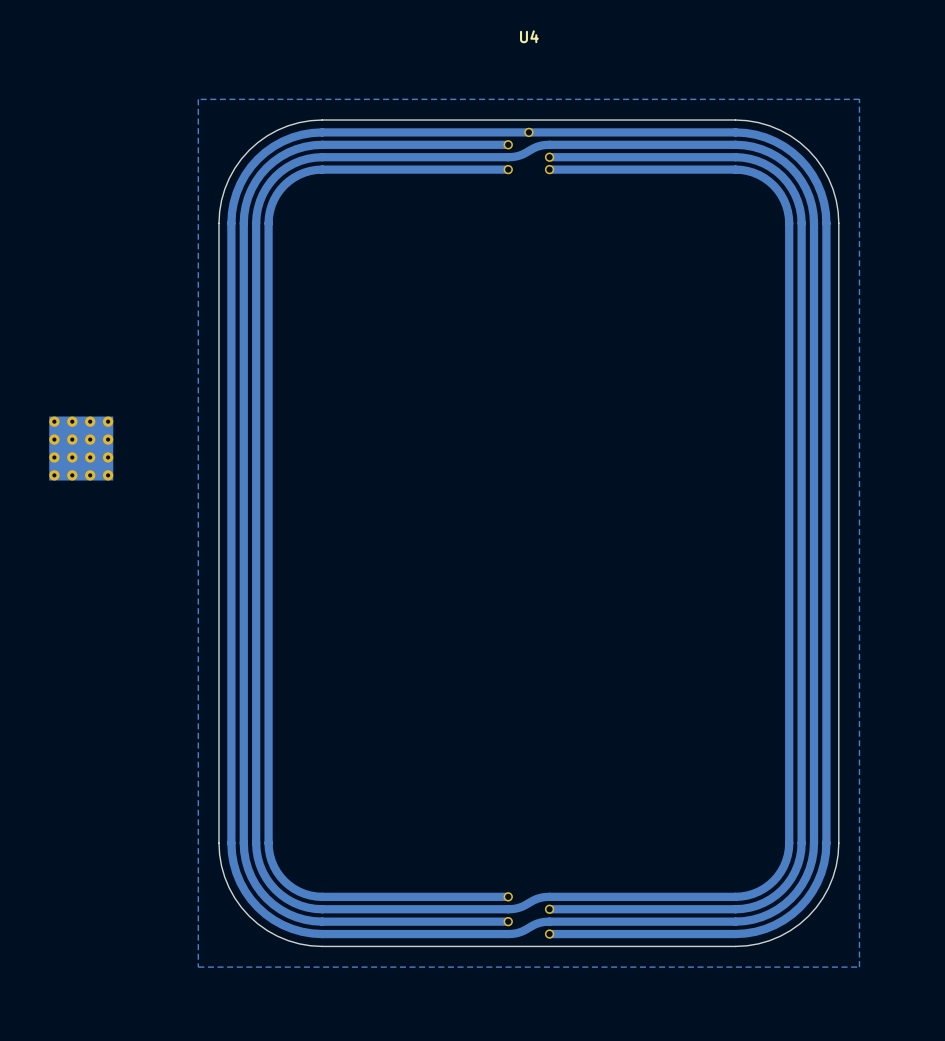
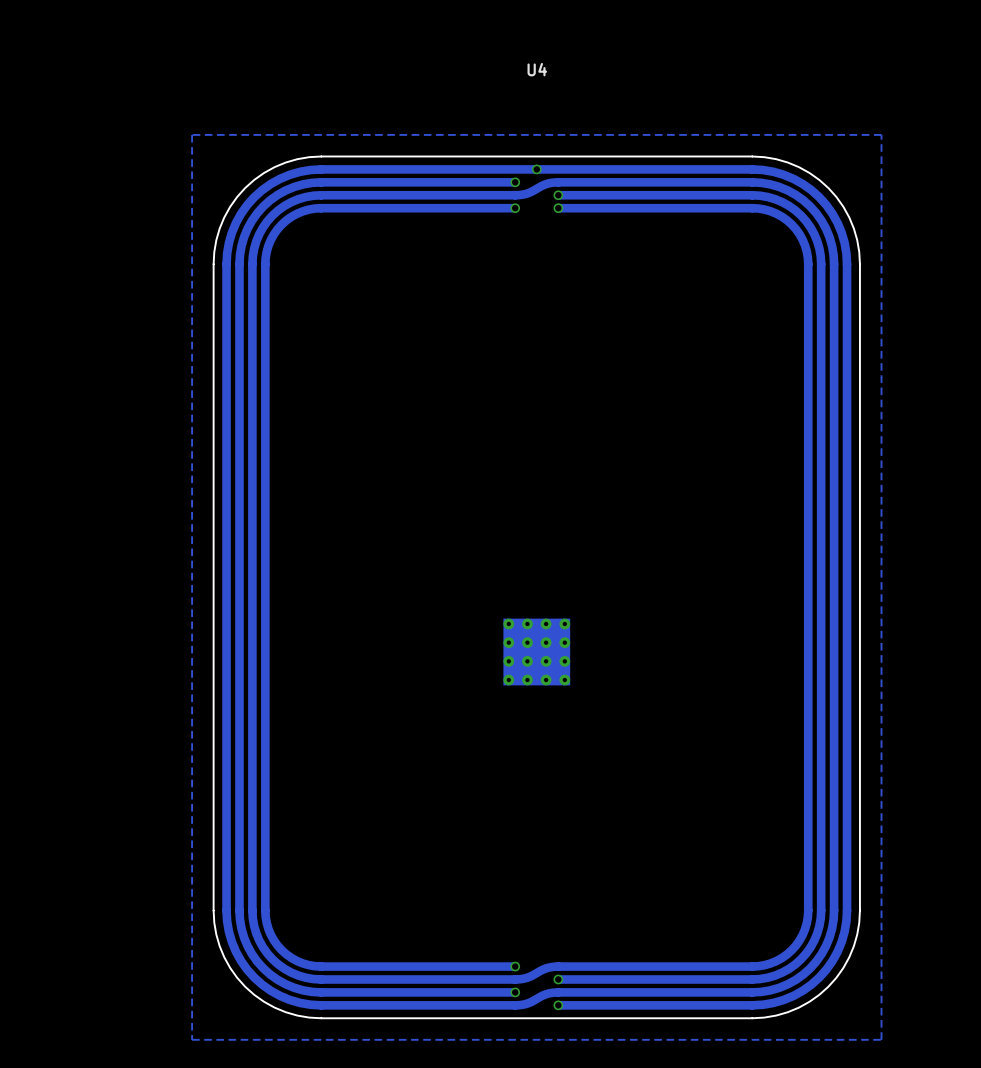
part position: (81, 448) -> (536, 652)

